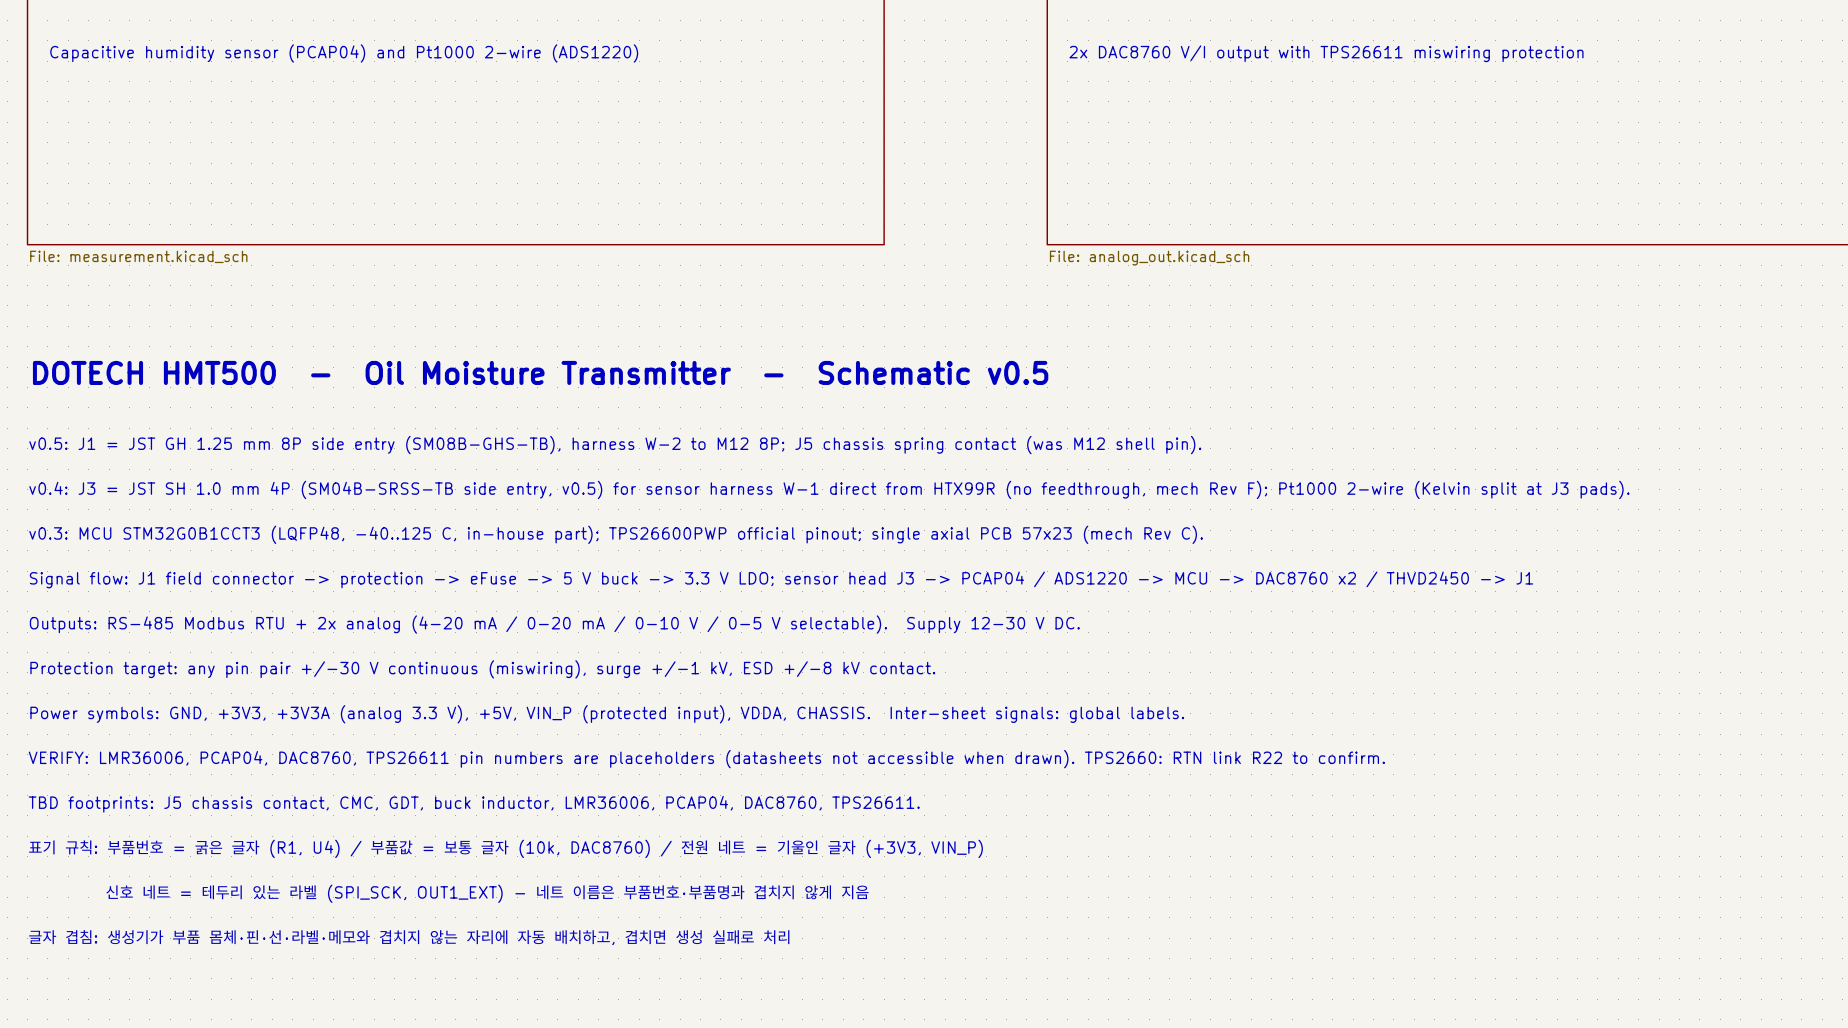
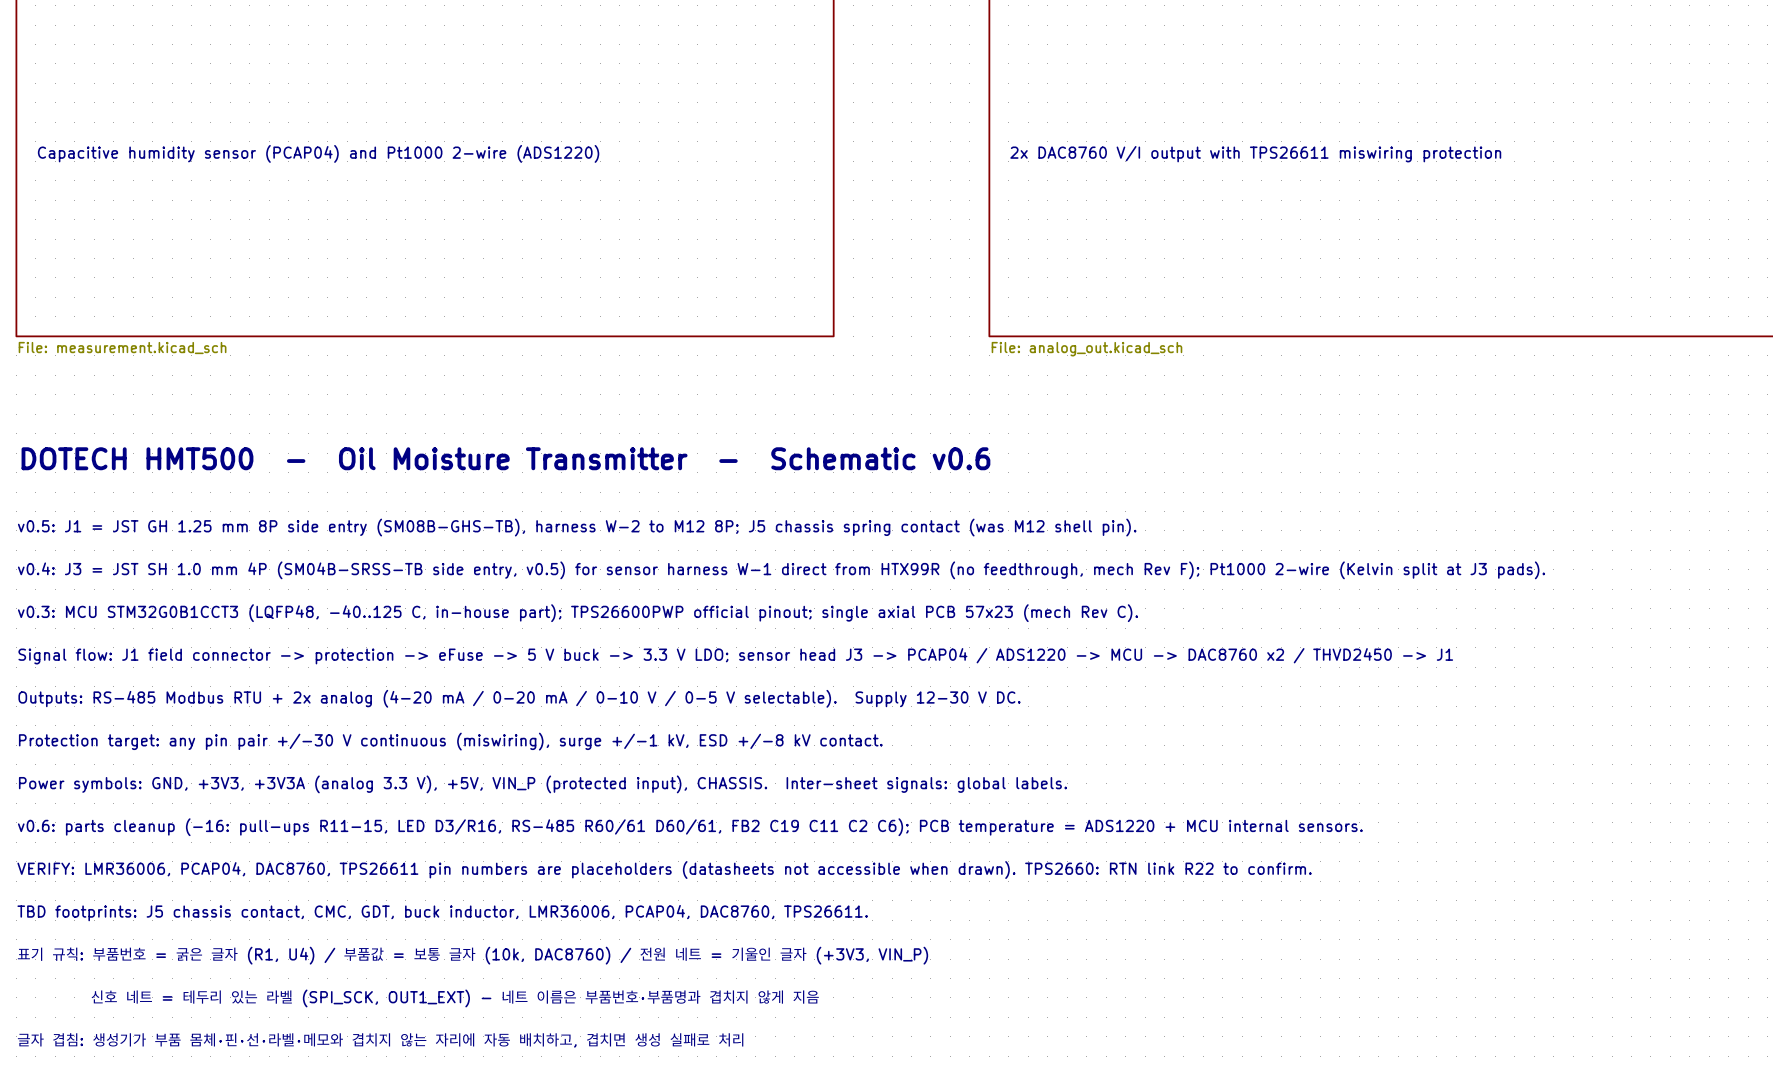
text: DOTECH HMT500 - Oil Moisture Transmitter - Schematic v0.5 (540, 372) -> DOTECH HMT500 - Oil Moisture Transmitter - Schematic v0.6 (505, 458)
text: Power symbols: GND, +3V3, +3V3A (analog 3.3 V), +5V, VIN_P (protected input), VDDA, CHASSIS. Inter-sheet signals: global labels. (607, 714) -> Power symbols: GND, +3V3, +3V3A (analog 3.3 V), +5V, VIN_P (protected input), CHASSIS. Inter-sheet signals: global labels. (542, 784)
text: VERIFY: LMR36006, PCAP04, DAC8760, TPS26611 pin numbers are placeholders (datasheets not accessible when drawn). TPS2660: RTN link R22 to confirm. (706, 759) -> v0.6: parts cleanup (-16: pull-ups R11-15, LED D3/R16, RS-485 R60/61 D60/61, FB2 C19 C11 C2 C6); PCB temperature = ADS1220 + MCU internal sensors. (690, 827)
text: TBD footprints: J5 chassis contact, CMC, GDT, buck inductor, LMR36006, PCAP04, DAC8760, TPS26611. (474, 804) -> VERIFY: LMR36006, PCAP04, DAC8760, TPS26611 pin numbers are placeholders (datasheets not accessible when drawn). TPS2660: RTN link R22 to confirm. (664, 870)
text: 표기 규칙: 부품번호 = 굵은 글자 (R1, U4) / 부품값 = 보통 글자 (10k, DAC8760) / 전원 네트 = 기울인 글자 (+3V3, VIN_P) (505, 848) -> TBD footprints: J5 chassis contact, CMC, GDT, buck inductor, LMR36006, PCAP04, DAC8760, TPS26611. (442, 913)
text: 신호 네트 = 테두리 있는 라벨 (SPI_SCK, OUT1_EXT) - 네트 이름은 부품번호·부품명과 겹치지 않게 지음 (487, 893) -> 표기 규칙: 부품번호 = 굵은 글자 (R1, U4) / 부품값 = 보통 글자 (10k, DAC8760) / 전원 네트 = 기울인 글자 (+3V3, VIN_P) (472, 955)
text: 글자 겹침: 생성기가 부품 몸체·핀·선·라벨·메모와 겹치지 않는 자리에 자동 배치하고, 겹치면 생성 실패로 처리 (409, 937) -> 신호 네트 = 테두리 있는 라벨 (SPI_SCK, OUT1_EXT) - 네트 이름은 부품번호·부품명과 겹치지 않게 지음 (455, 998)
text: none -> 글자 겹침: 생성기가 부품 몸체·핀·선·라벨·메모와 겹치지 않는 자리에 자동 배치하고, 겹치면 생성 실패로 처리 (380, 1040)

